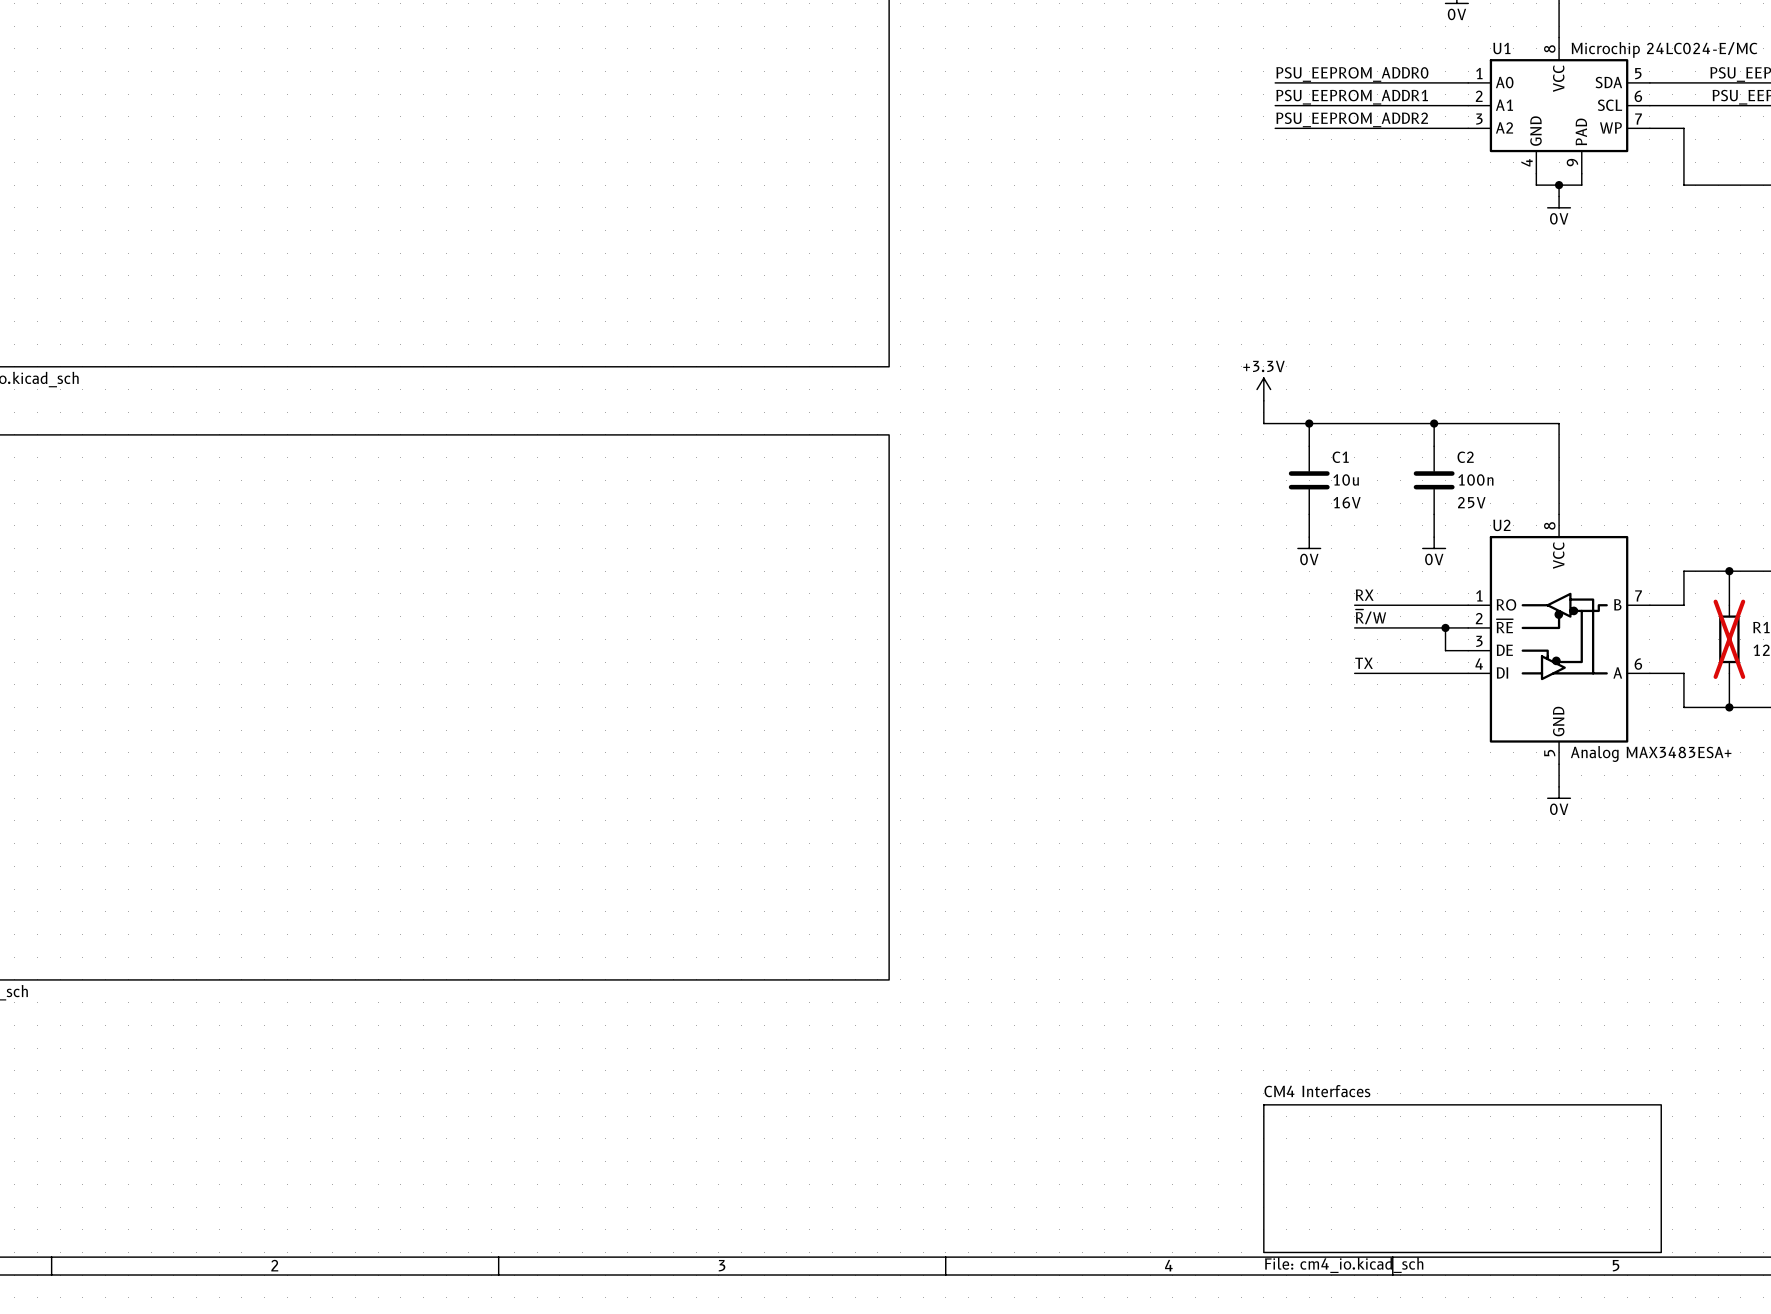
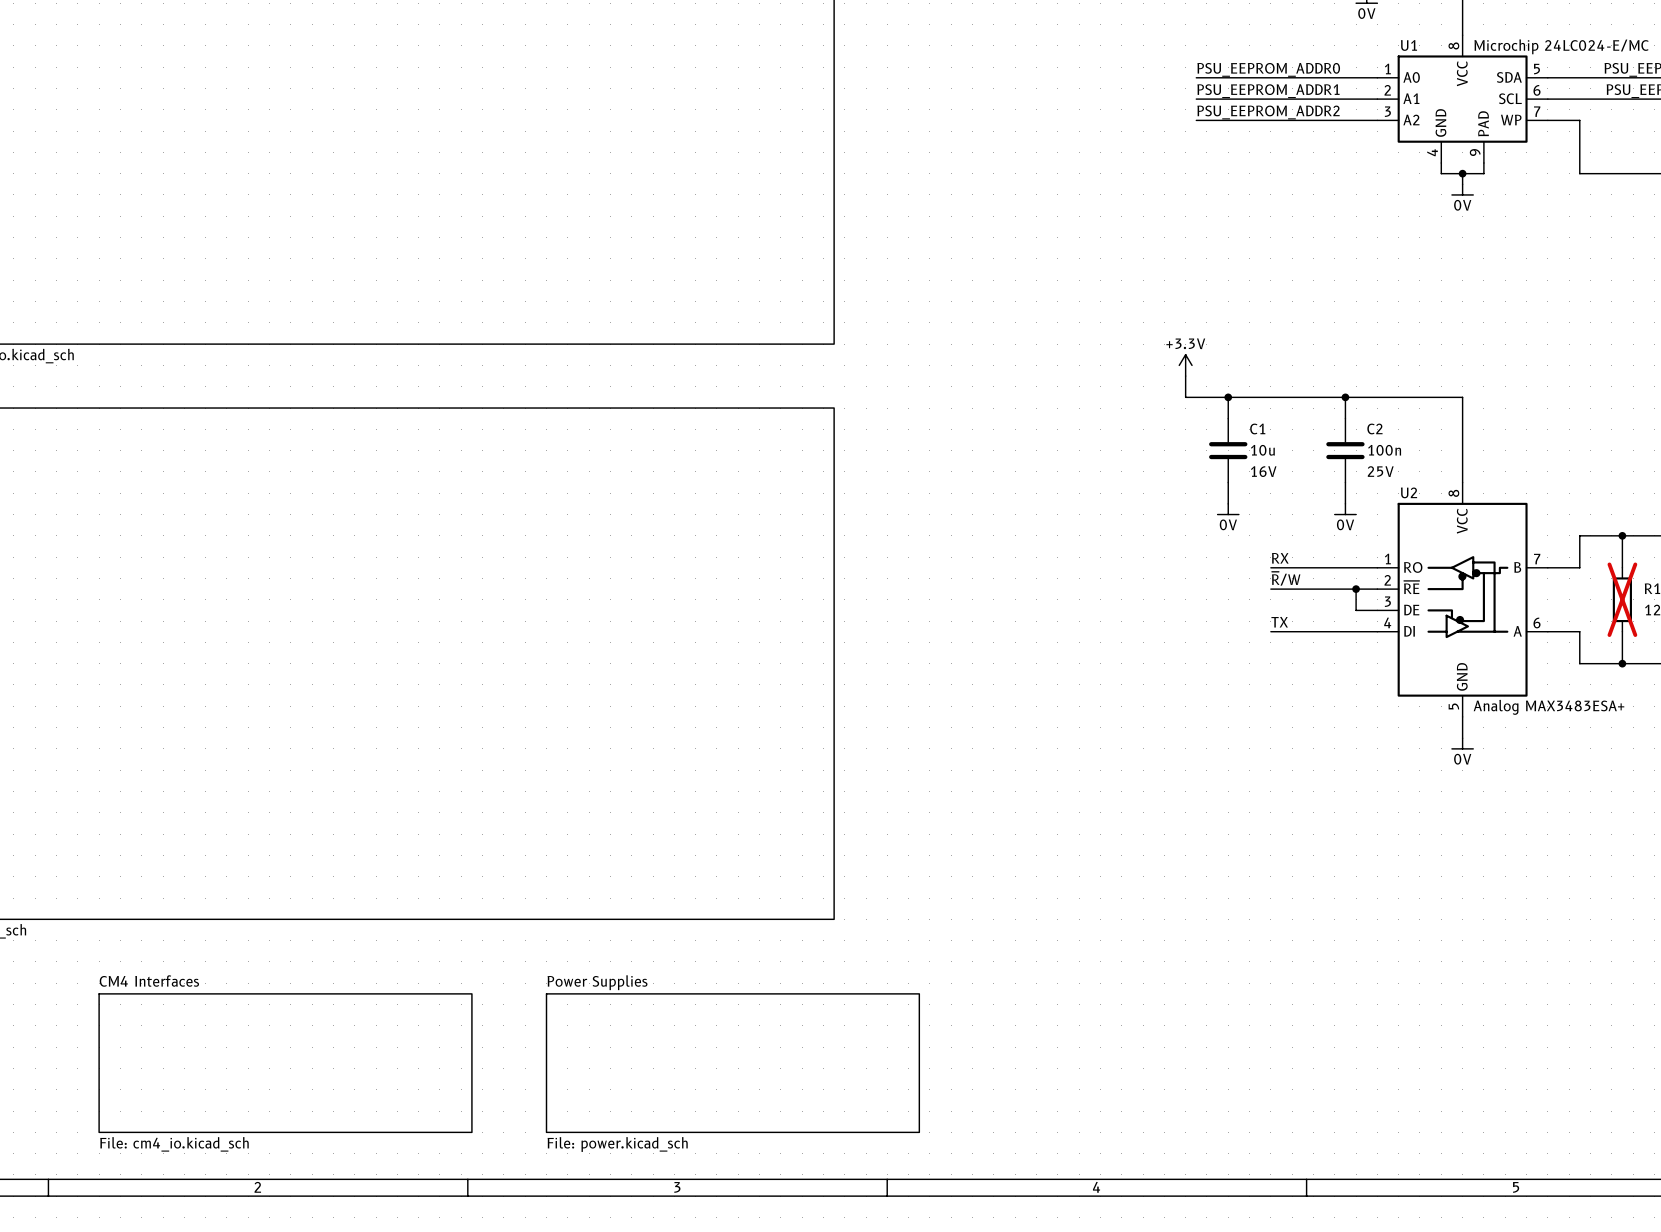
sheet Power Supplies: none -> File: power.kicad_sch (732, 1063)
sheet CM4 Interfaces position: (1462, 1178) -> (285, 1063)

